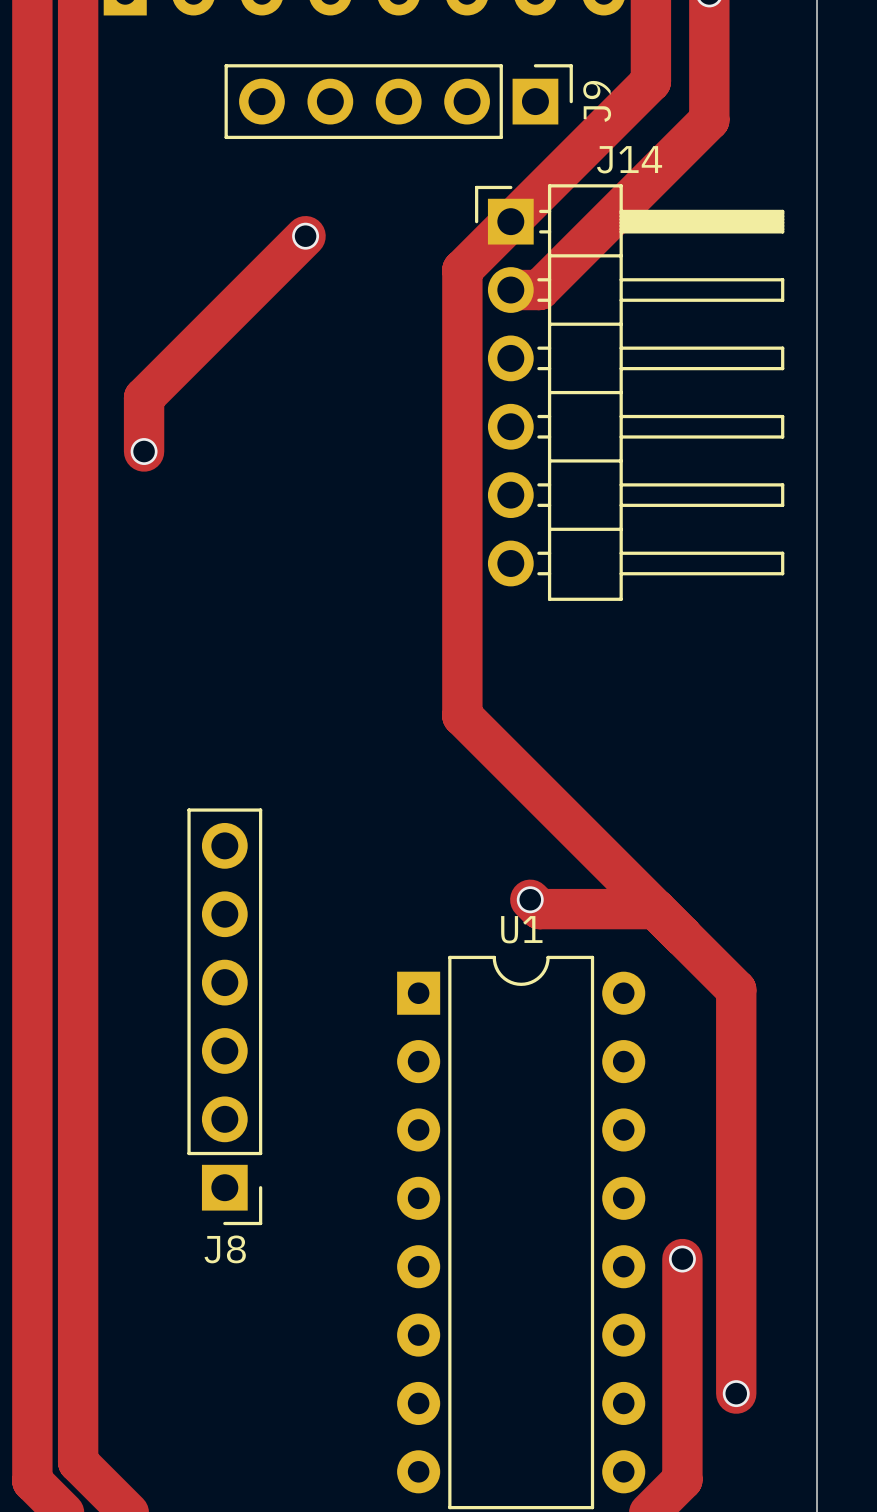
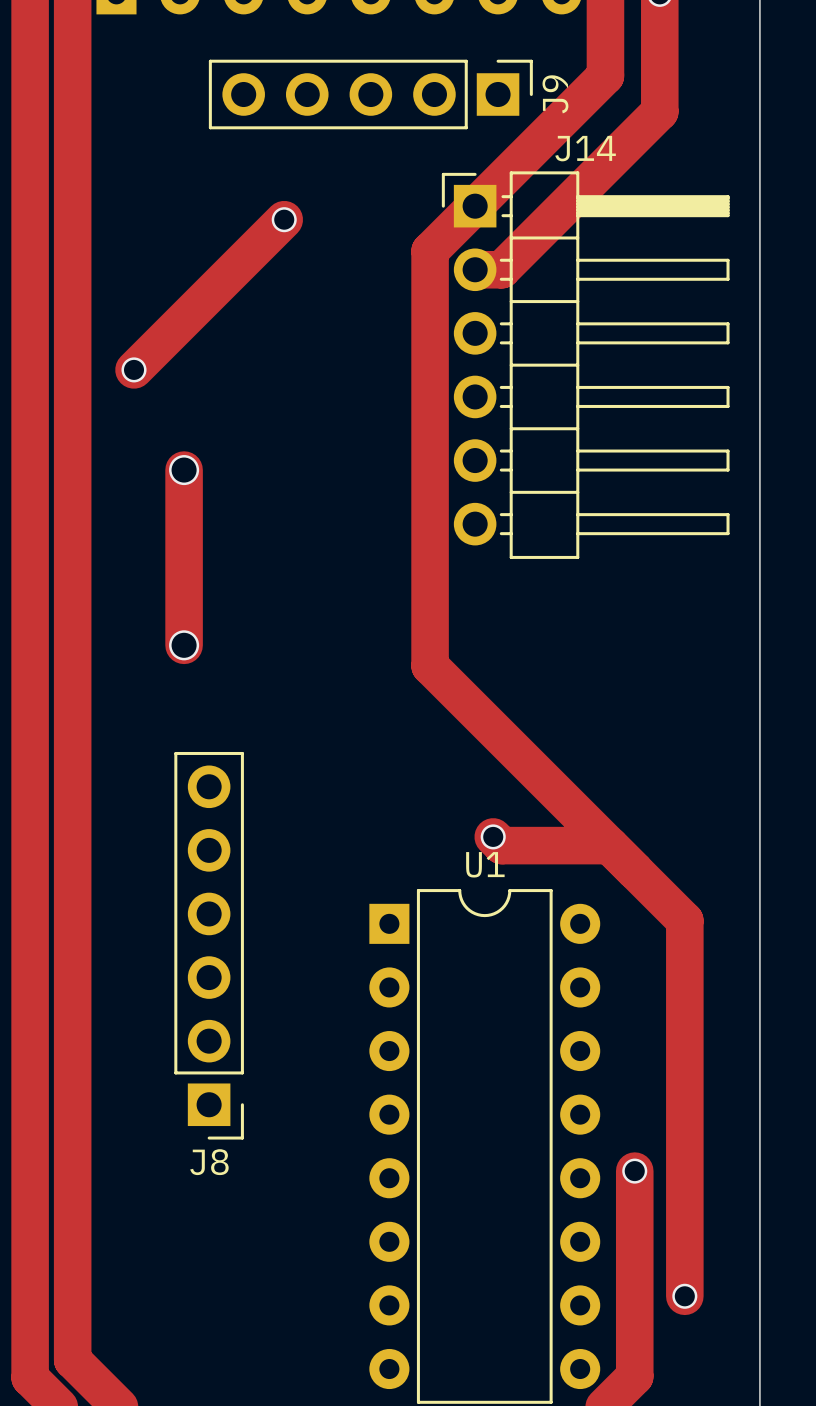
track: (144, 397) (144, 451) -> none
via position: (144, 451) -> (134, 369)
track: none -> (184, 470) (184, 645)
via: none -> (184, 470)
via: none -> (184, 645)

